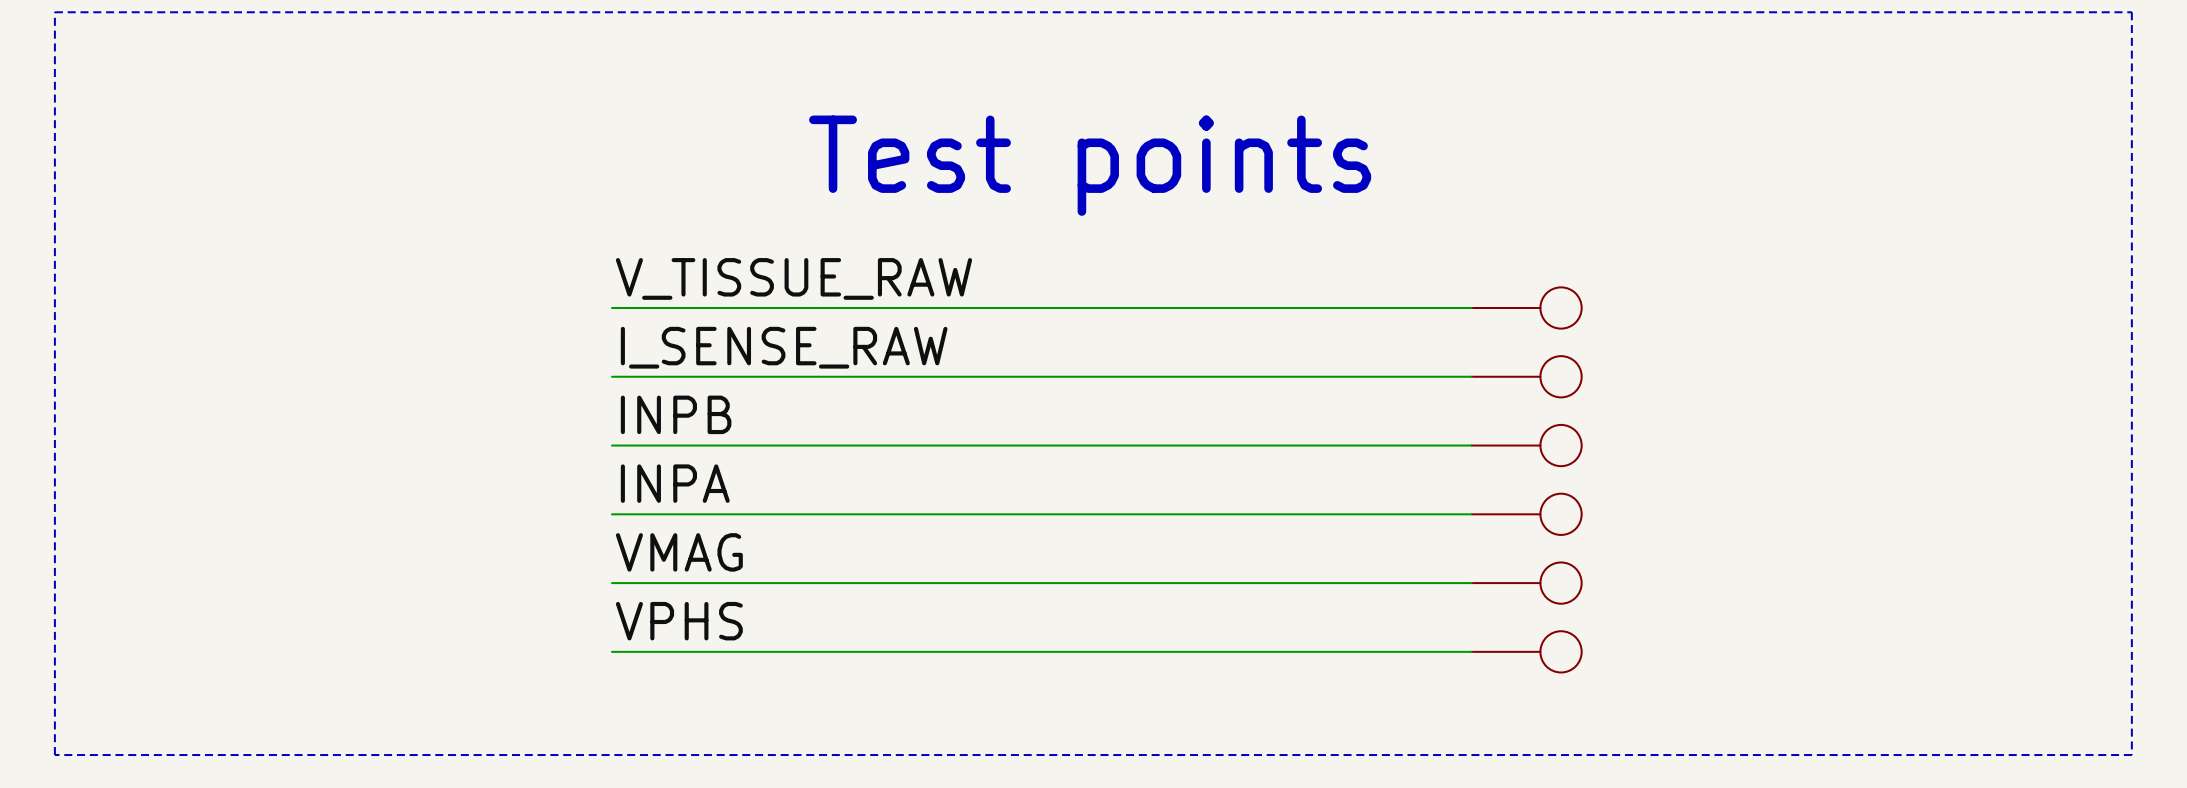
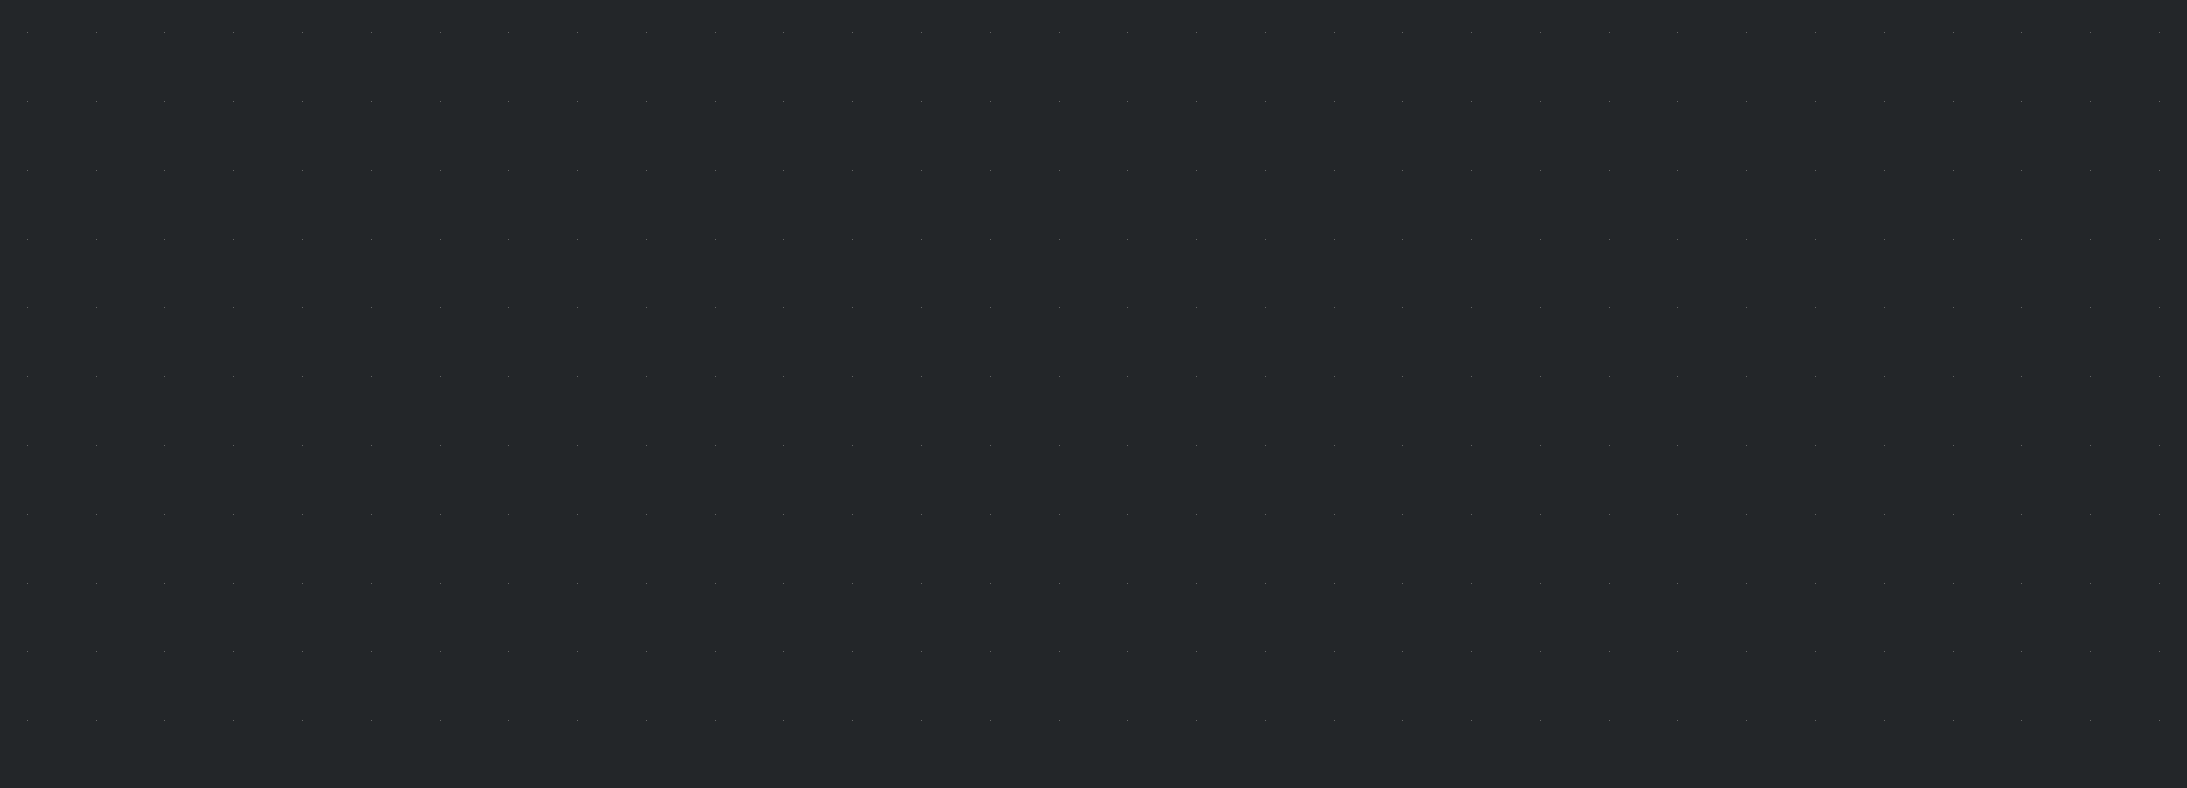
line: (54, 12) (2131, 12) (2131, 755) (54, 755) (54, 12) -> none
text: Test points (1090, 165) -> none
label: V_TISSUE_RAW (793, 278) -> none
wire: (611, 307) (1471, 307) -> none
part: (1526, 307) -> none
label: I_SENSE_RAW (784, 347) -> none
wire: (611, 376) (1471, 376) -> none
part: (1526, 376) -> none
label: INPB (676, 414) -> none
wire: (611, 445) (1471, 445) -> none
part: (1526, 445) -> none
label: INPA (675, 483) -> none
wire: (611, 514) (1471, 514) -> none
part: (1526, 514) -> none
label: VMAG (679, 552) -> none
wire: (611, 583) (1471, 583) -> none
part: (1526, 583) -> none
label: VPHS (679, 621) -> none
wire: (611, 651) (1471, 651) -> none
part: (1526, 651) -> none

